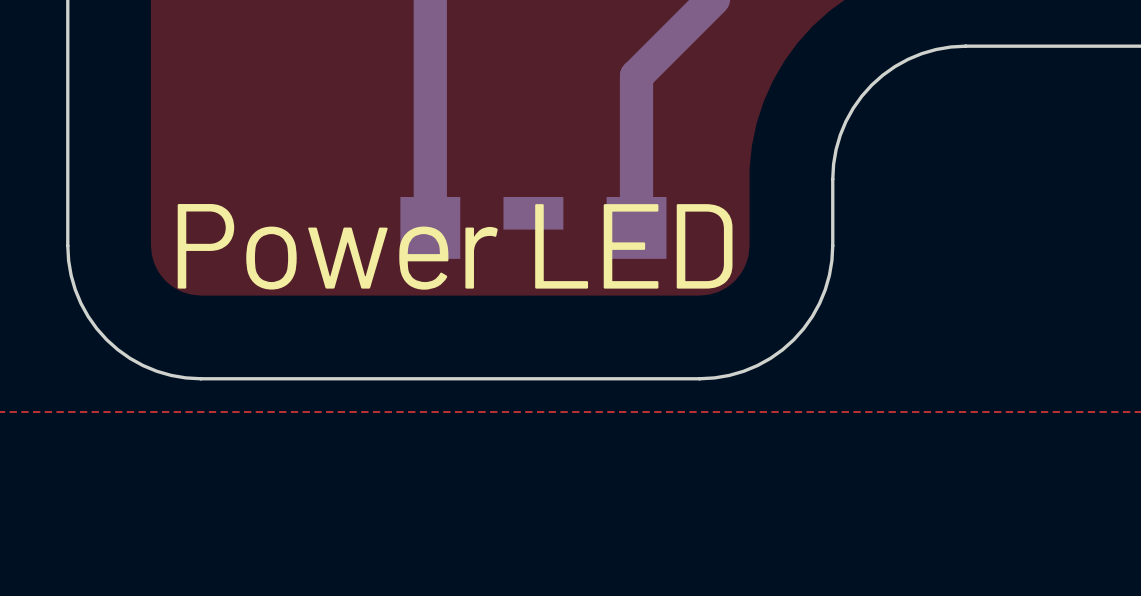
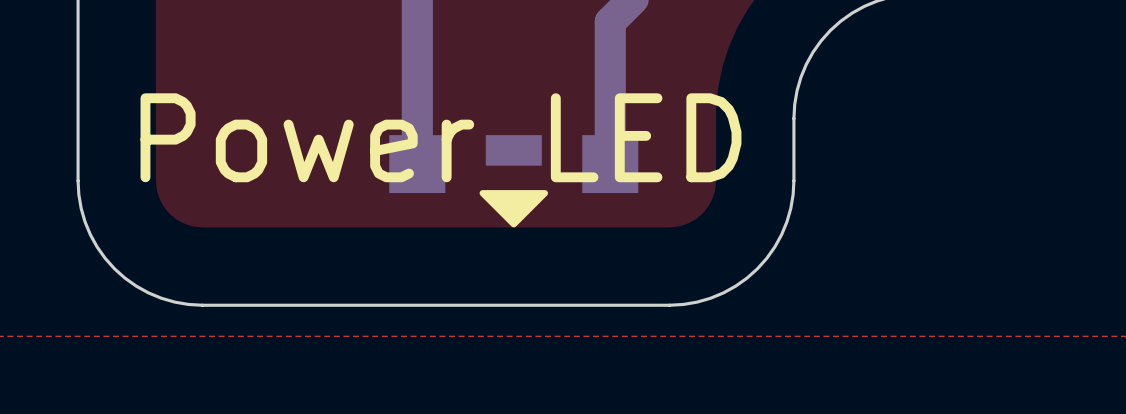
text position: Power LED (455, 246) -> Power LED (440, 137)
drawing: none -> [479, 190, 549, 228]

